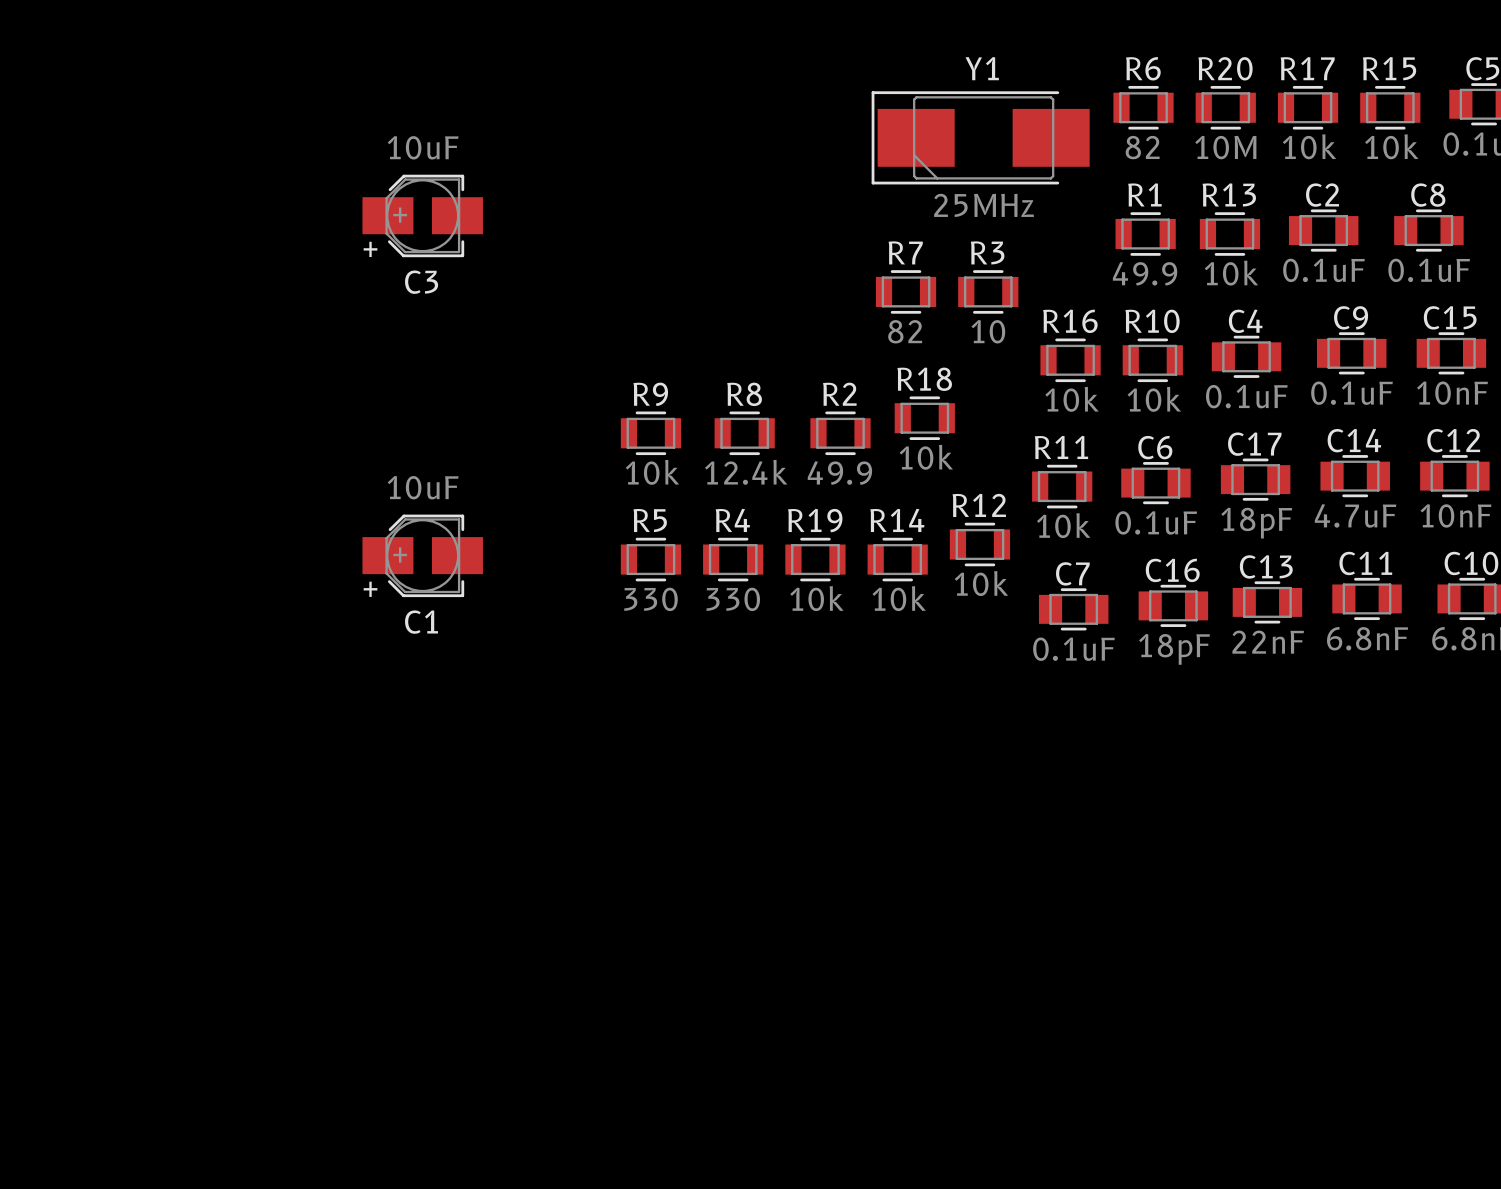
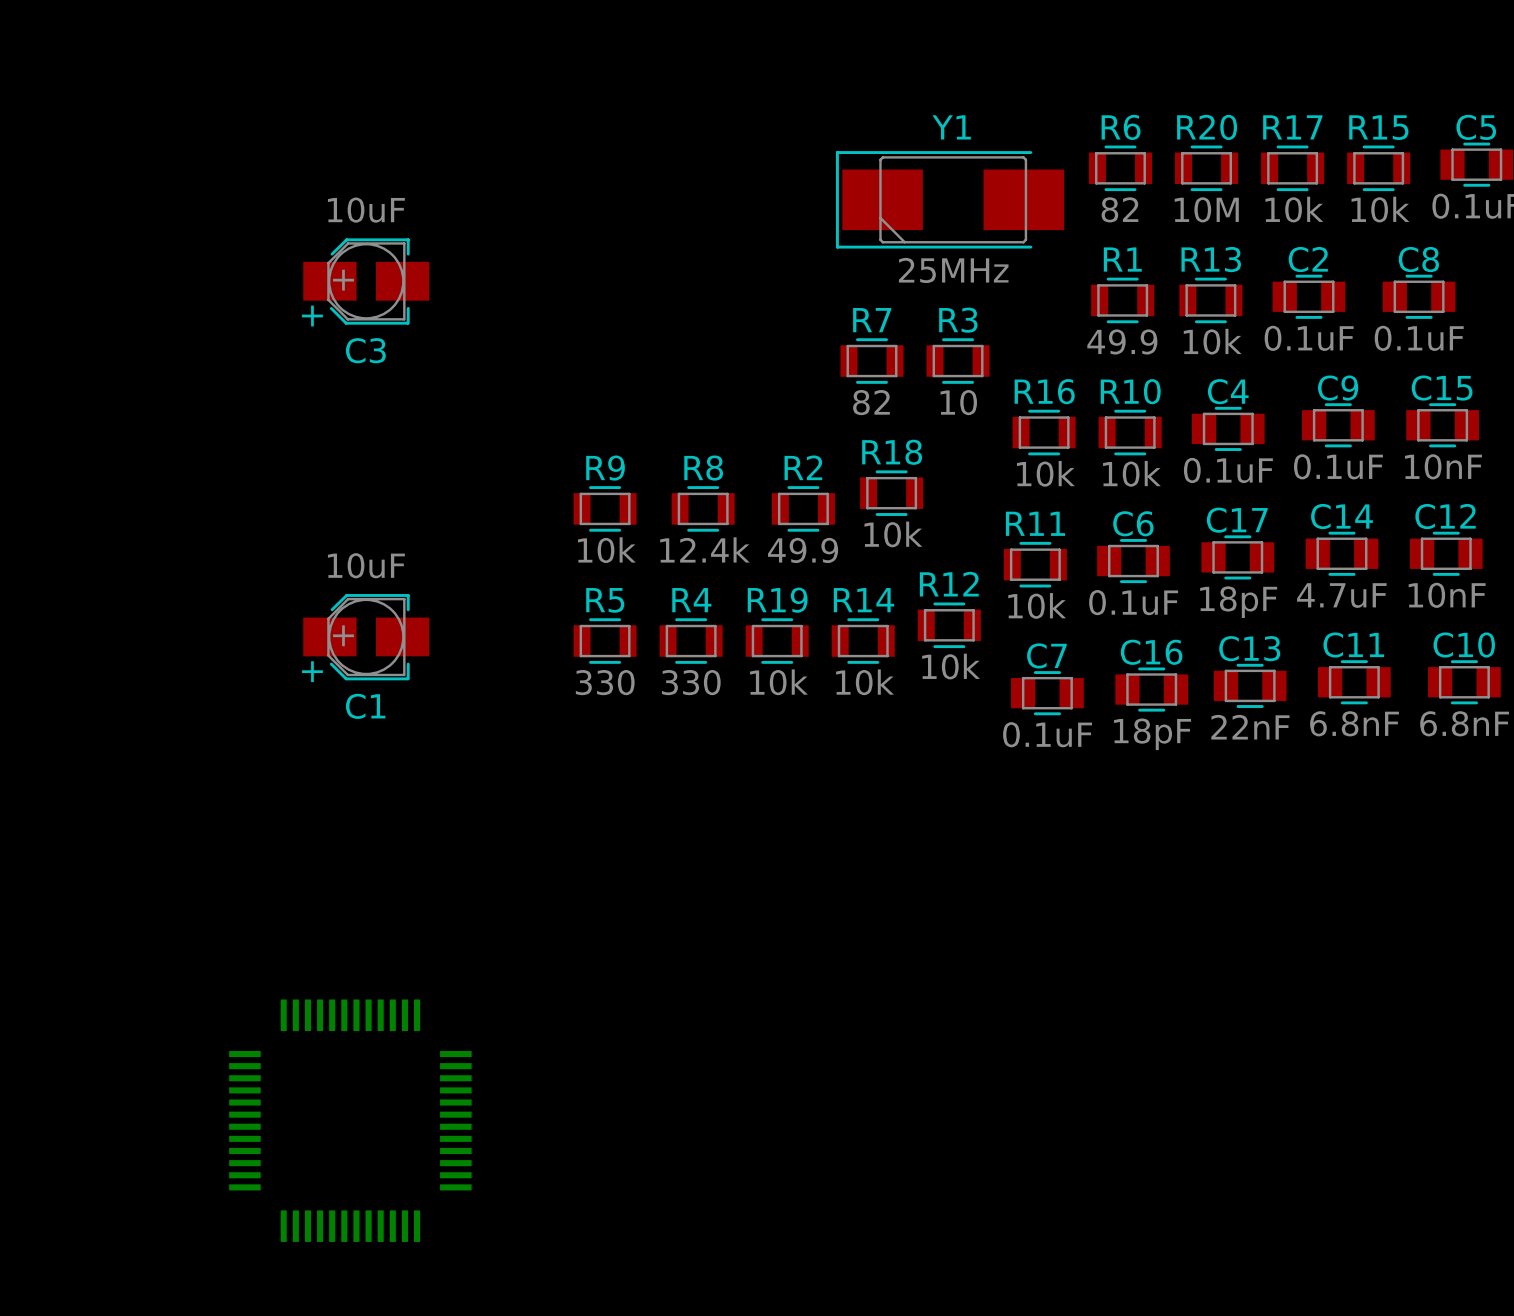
part: none -> (350, 1120)

